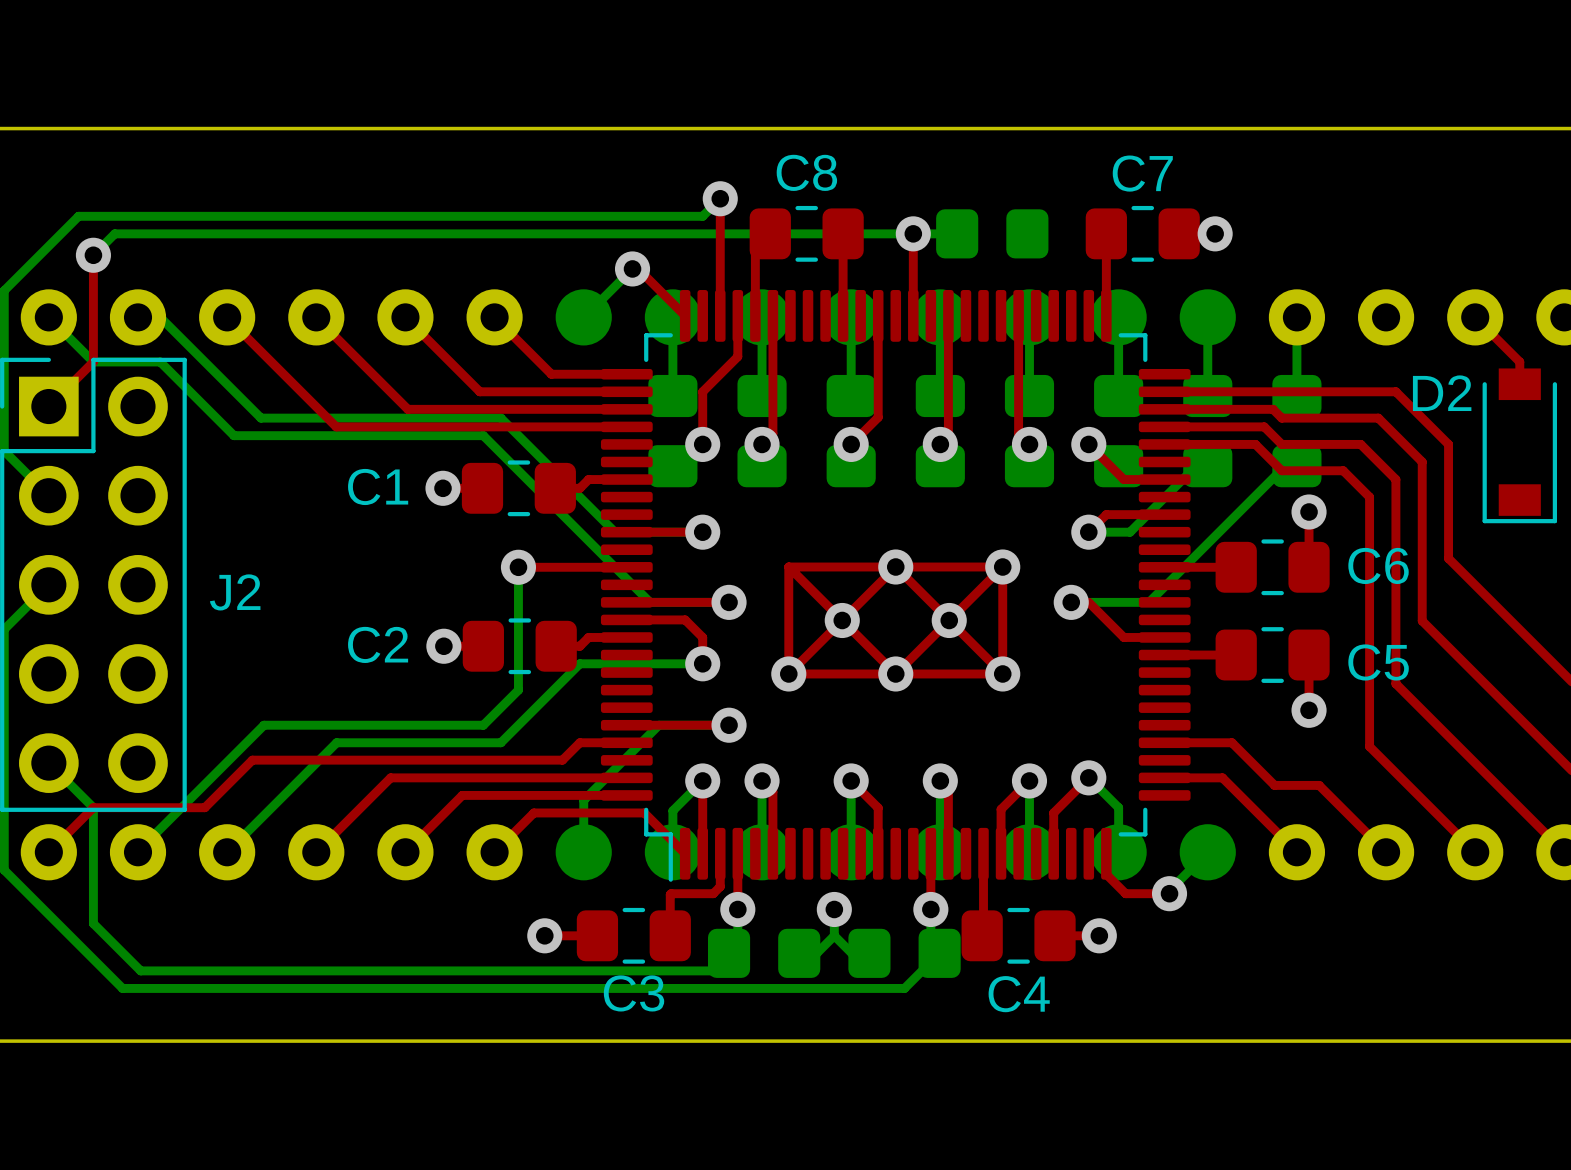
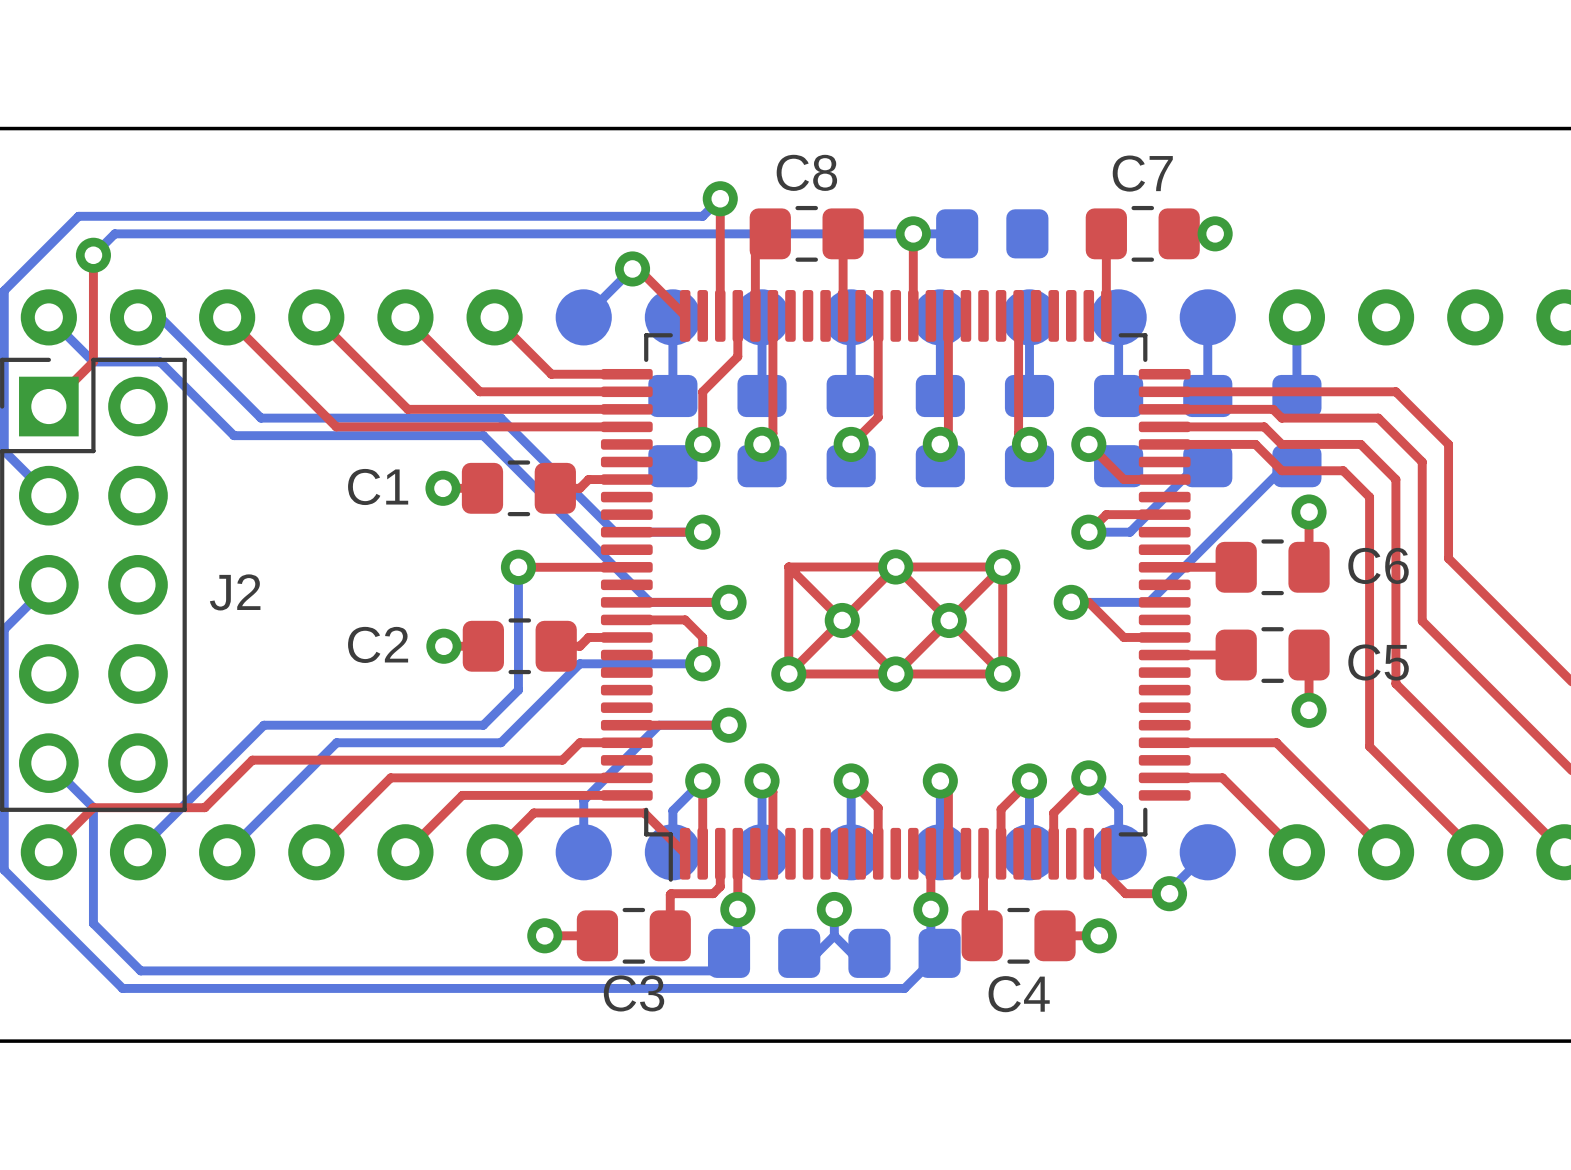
top track: (1475, 317) (1519, 361) (1519, 384) -> none
D2: (1519, 445) -> none
top track: (1232, 742) (1274, 785) (1319, 785) -> (1232, 742) (1276, 742) (1319, 785)

